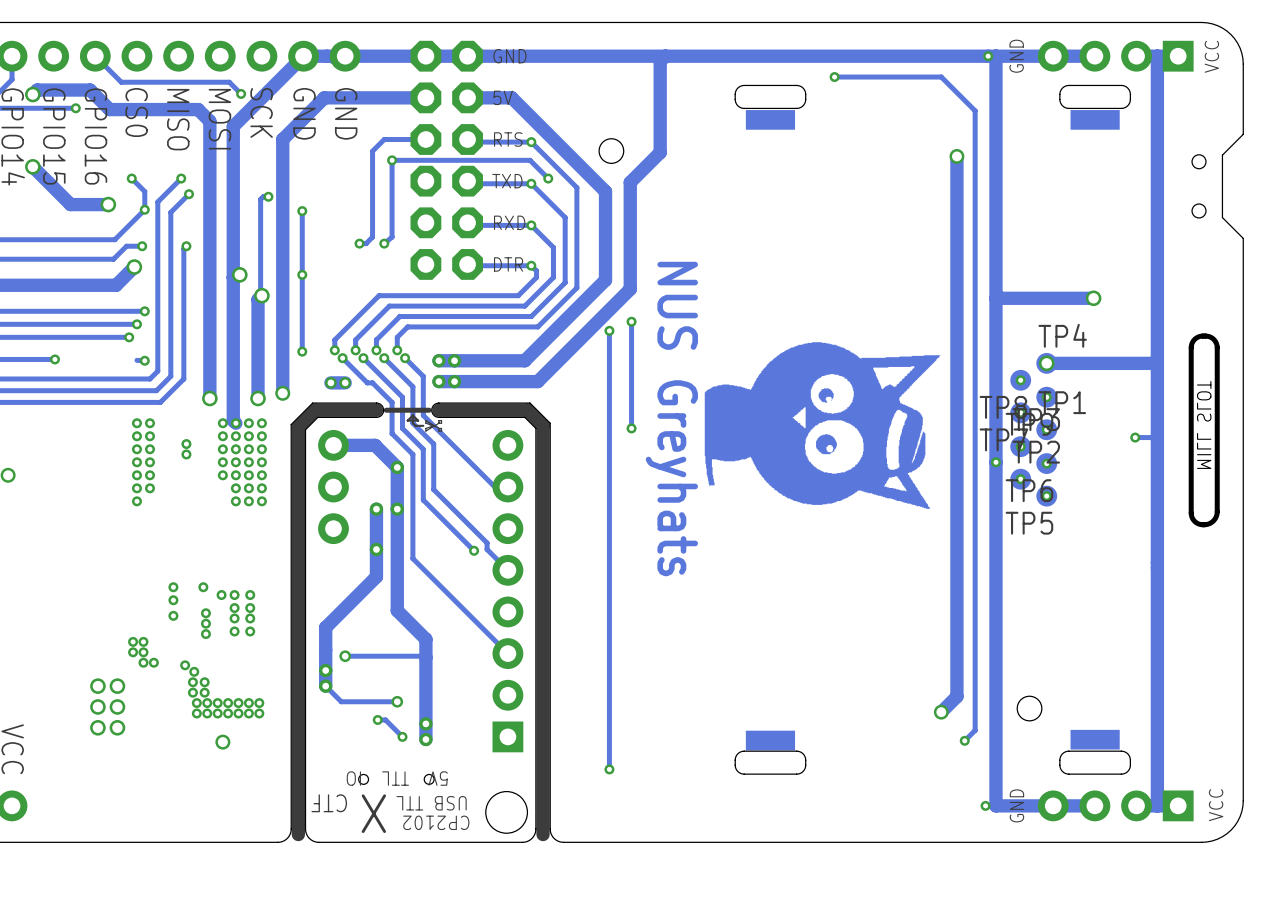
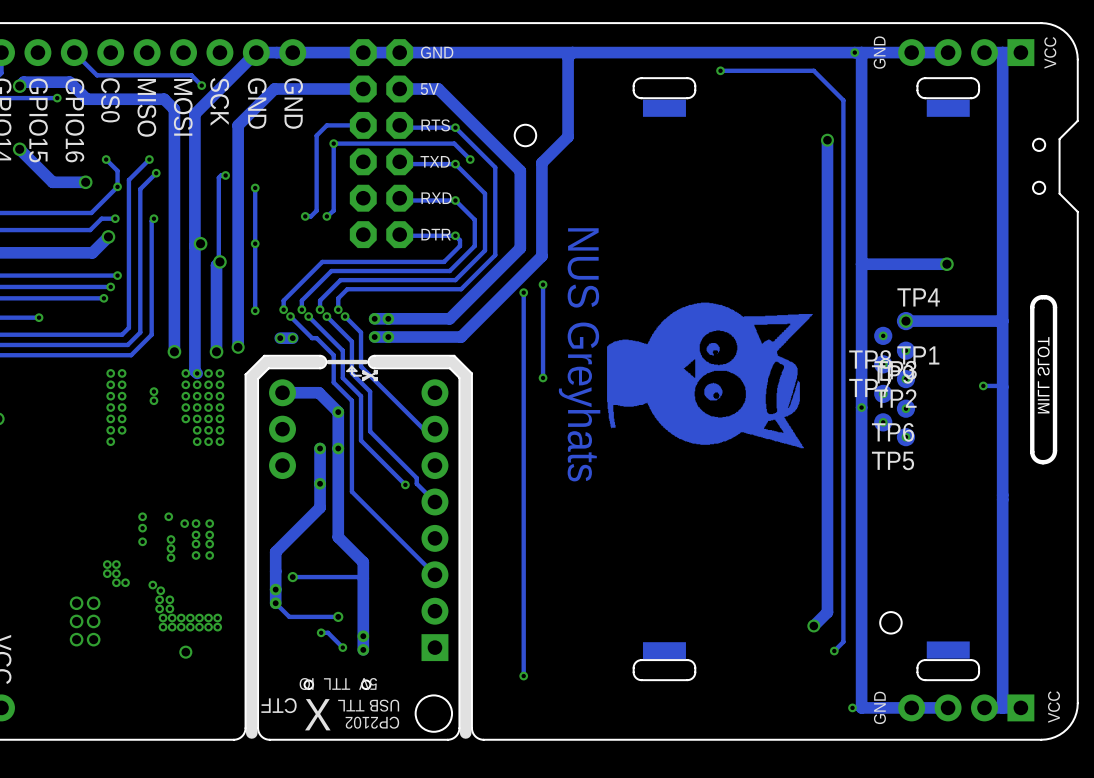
track: (136, 360) (144, 360) -> none
via: (144, 360) -> none

